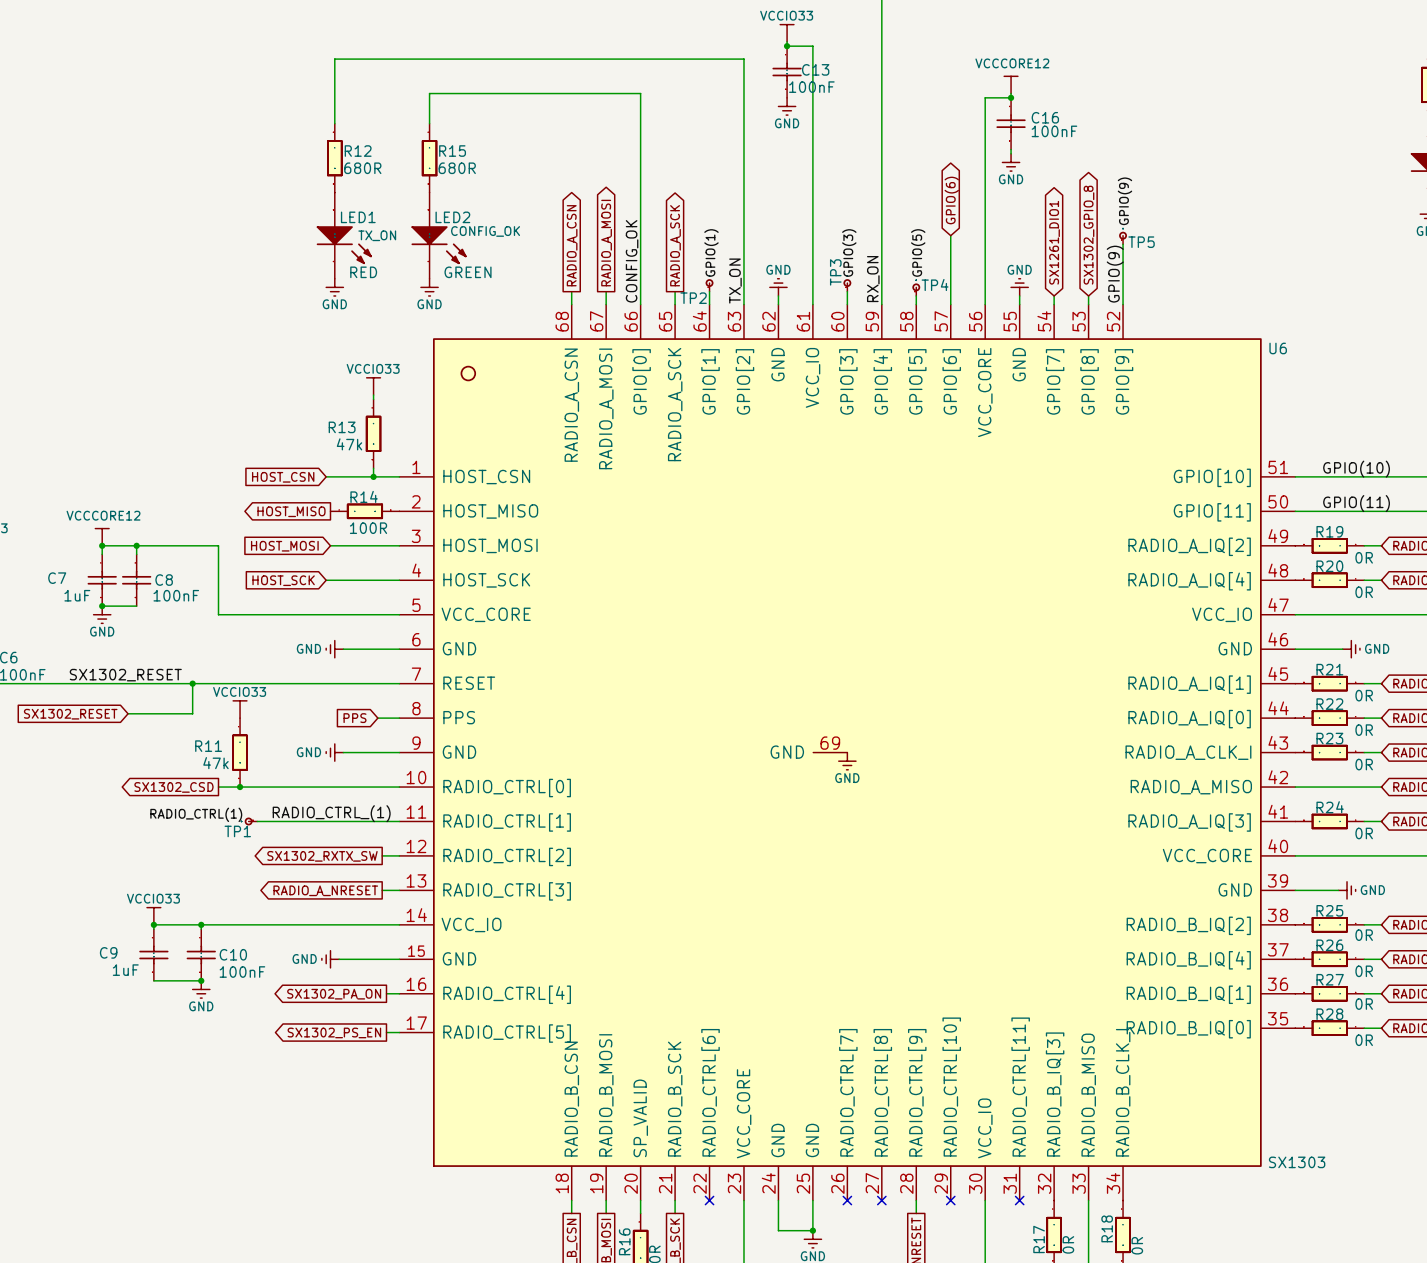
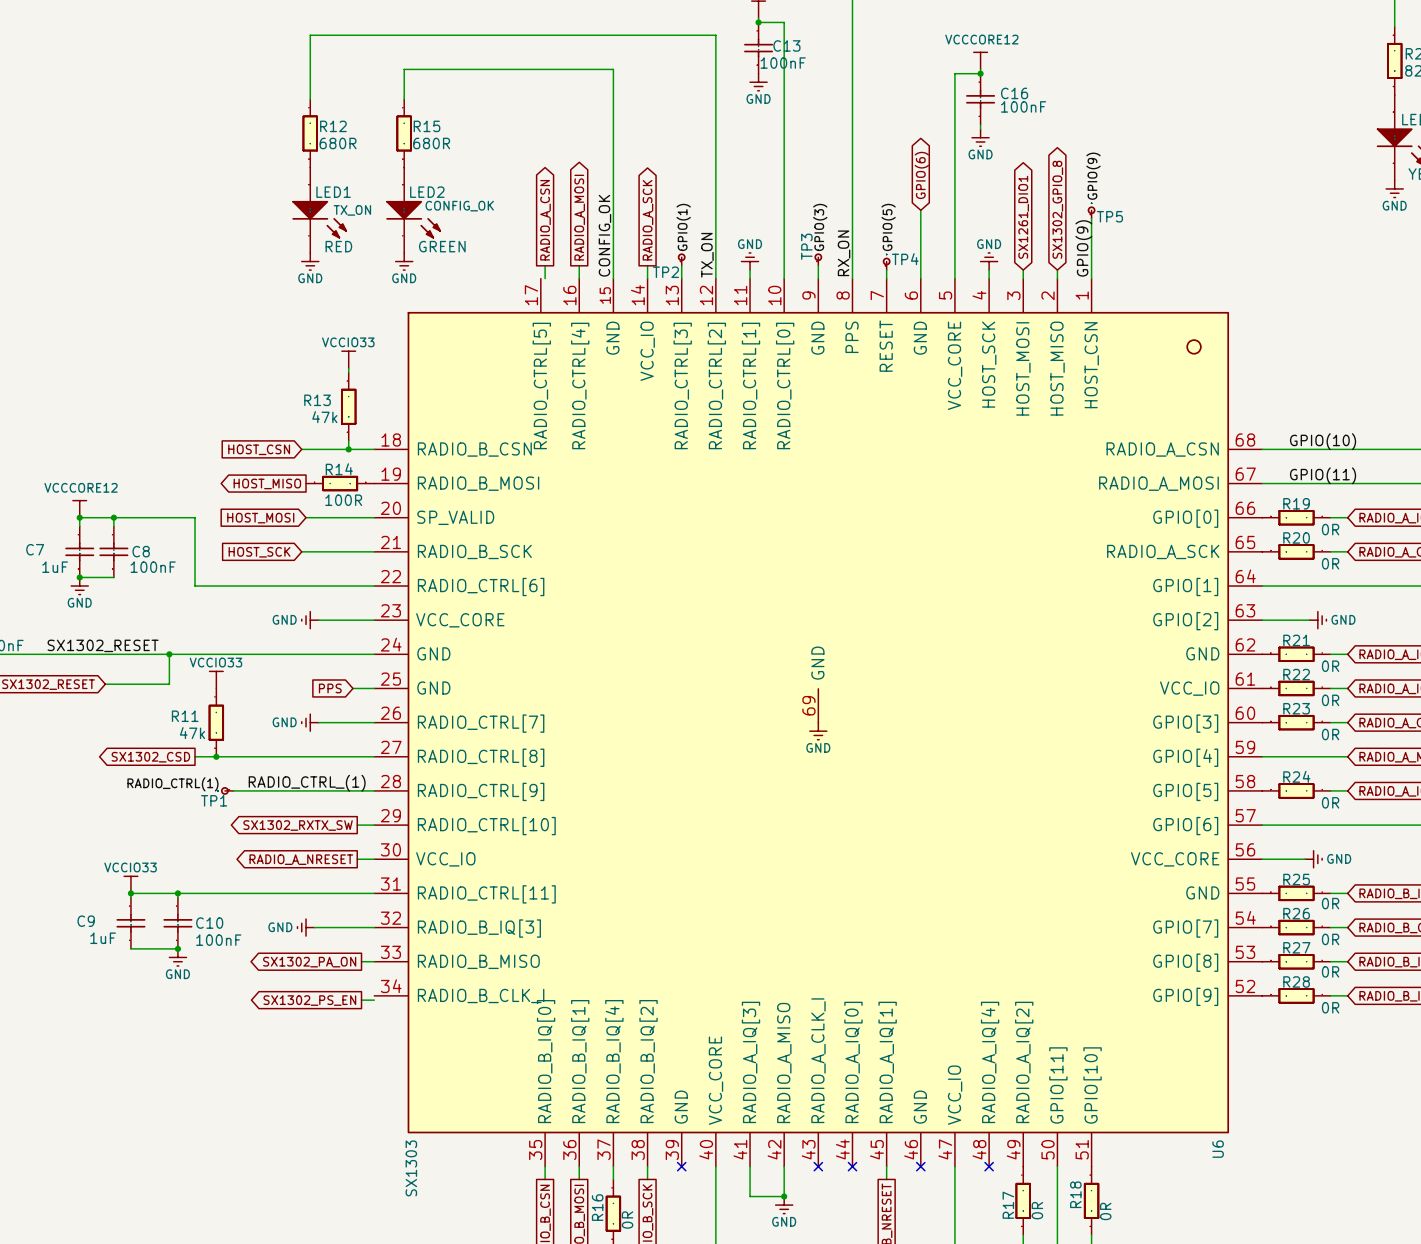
U6 rotation: 0° (847, 752) -> 90° clockwise (818, 722)

